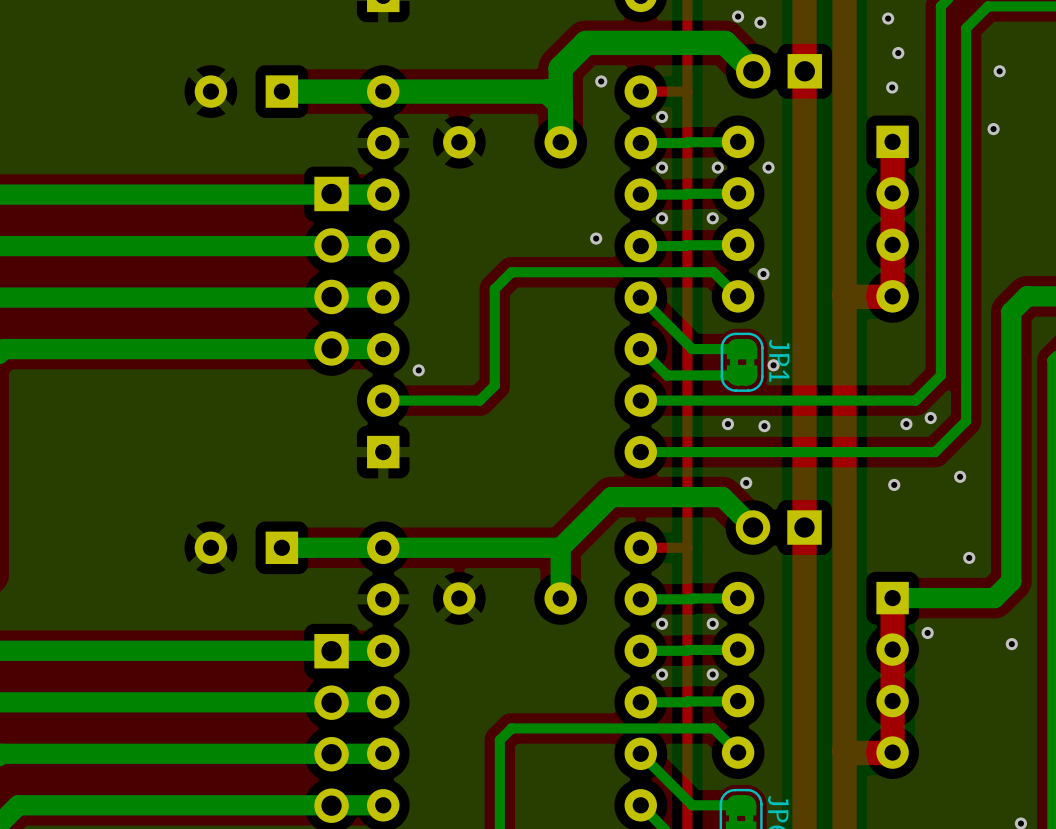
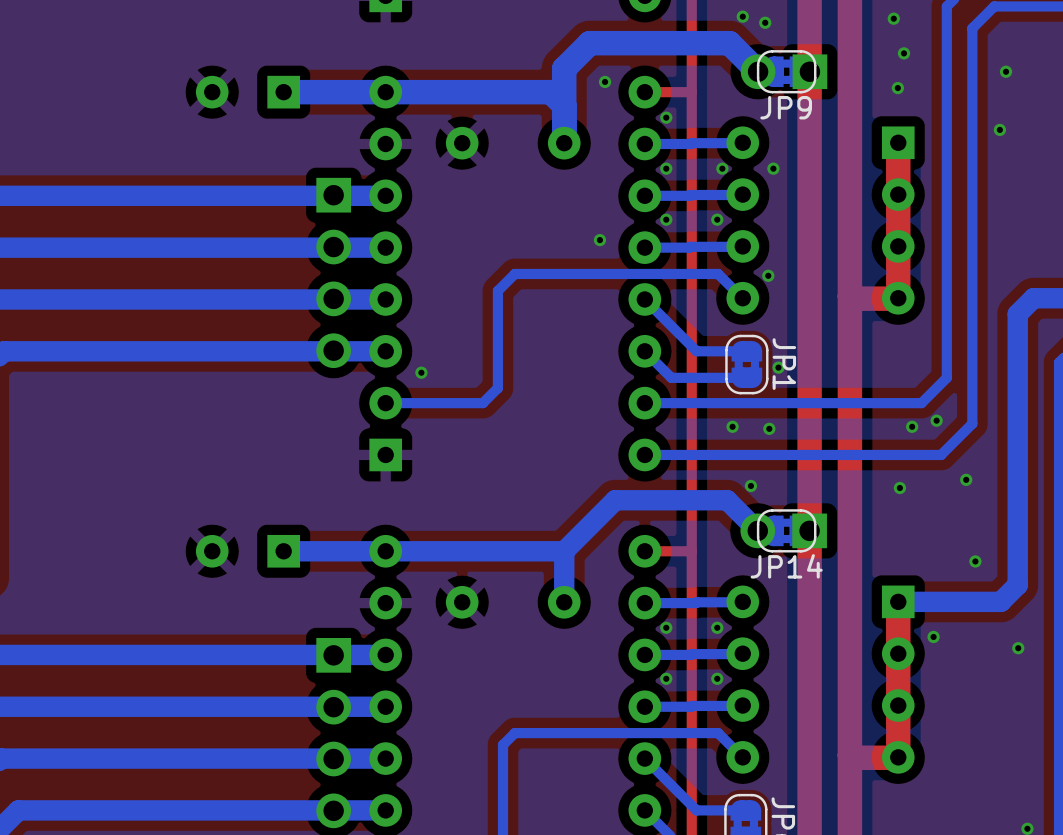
JP9: none -> (786, 71)
JP14: none -> (786, 530)

